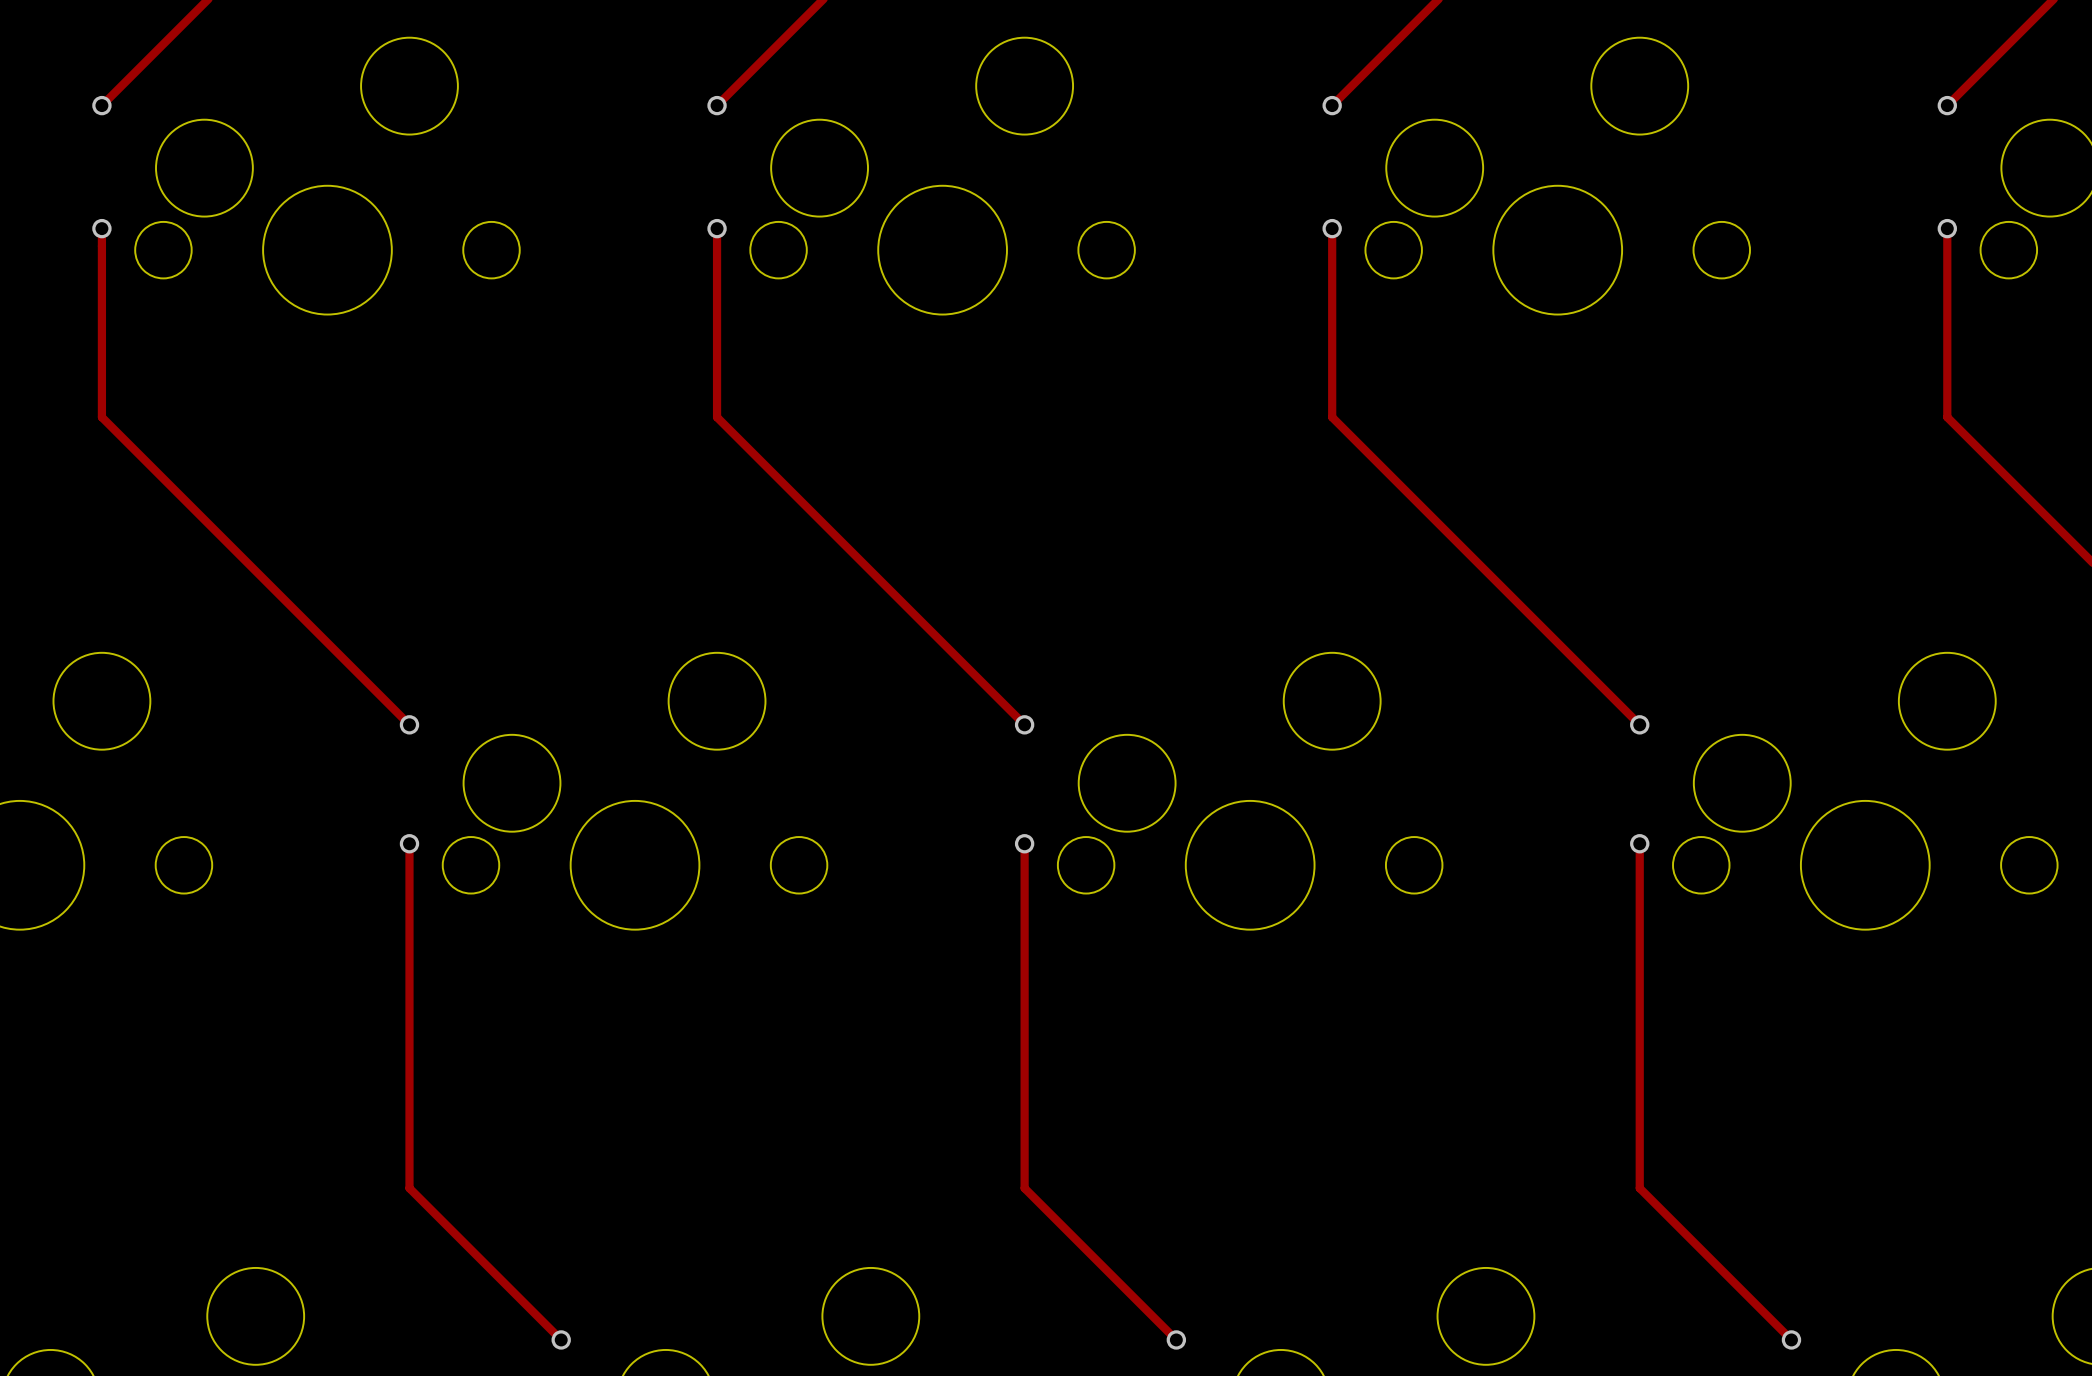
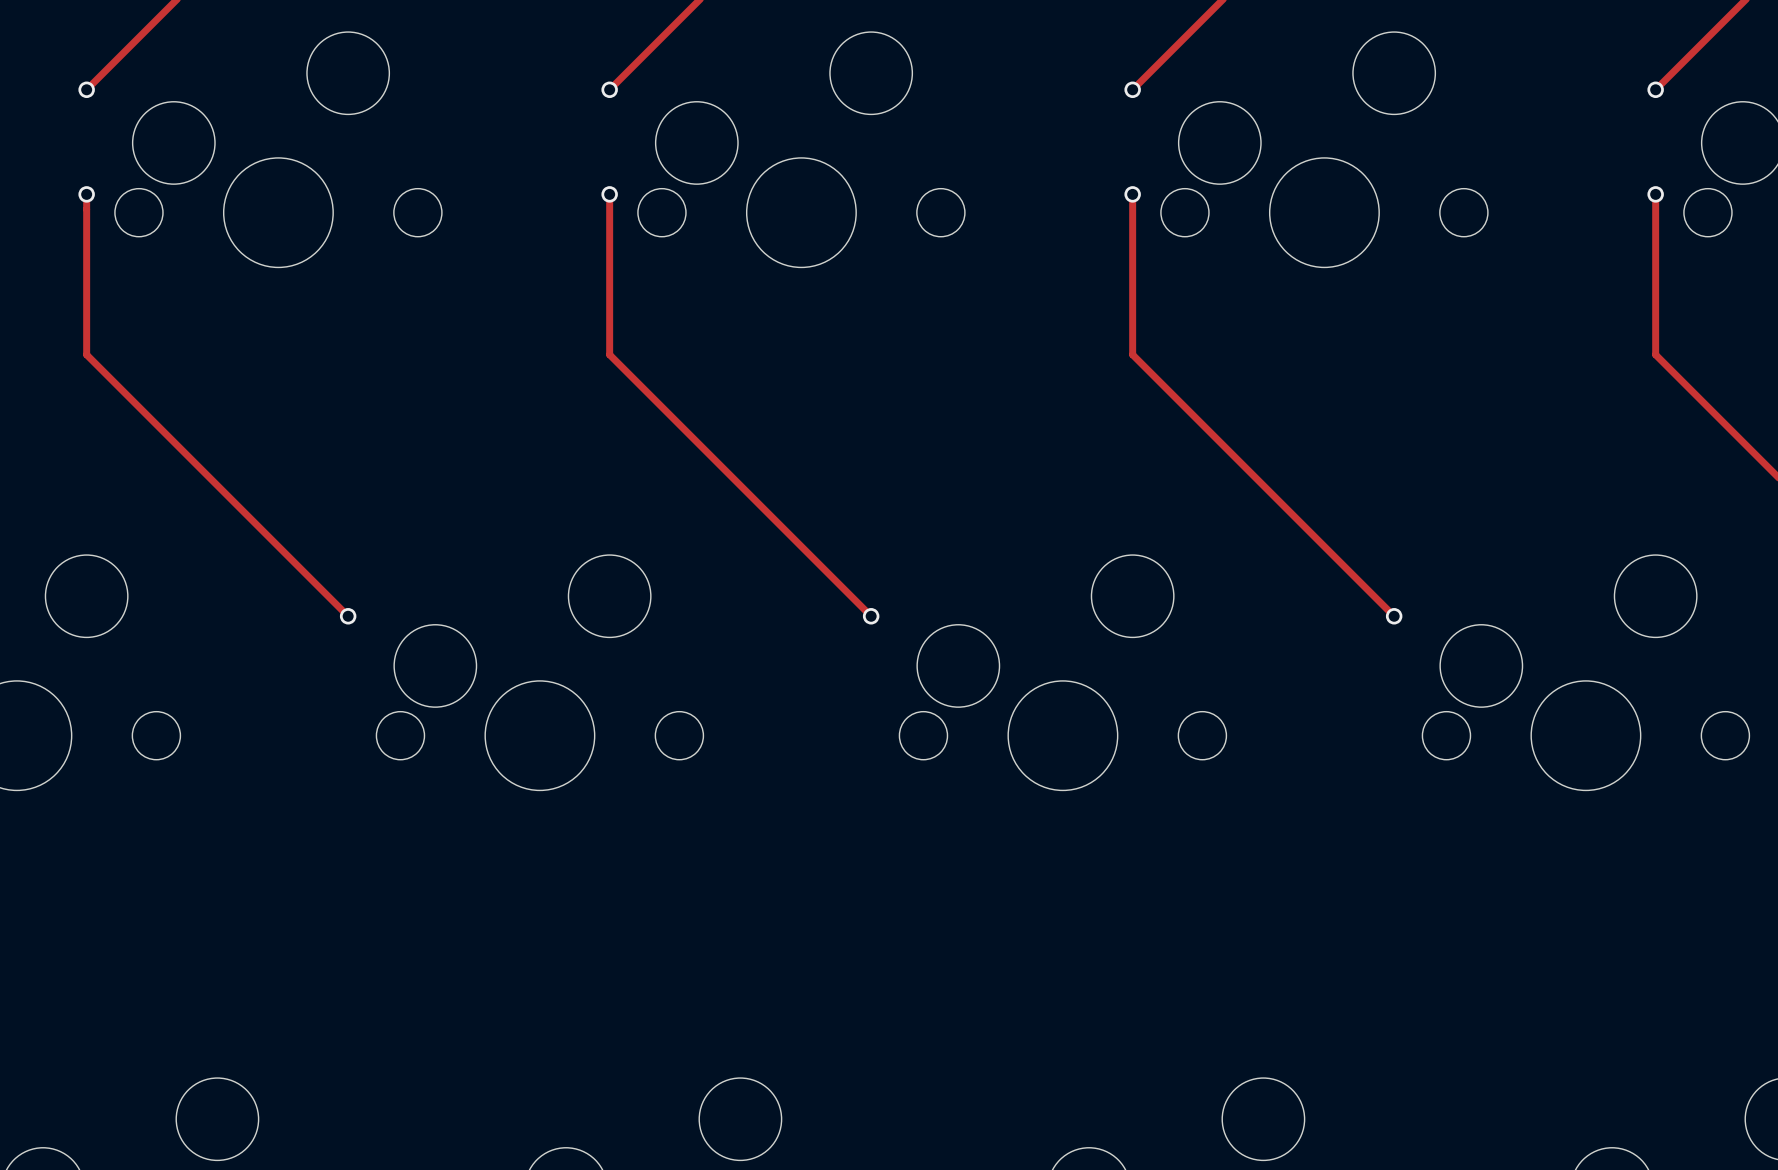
track: (409, 843) (409, 1188) (561, 1339) -> none
via: (409, 843) -> none
track: (1024, 843) (1024, 1188) (1176, 1339) -> none
via: (1024, 843) -> none
track: (1639, 843) (1639, 1188) (1791, 1339) -> none
via: (1639, 843) -> none
via: (561, 1339) -> none
via: (1176, 1339) -> none
via: (1791, 1339) -> none

